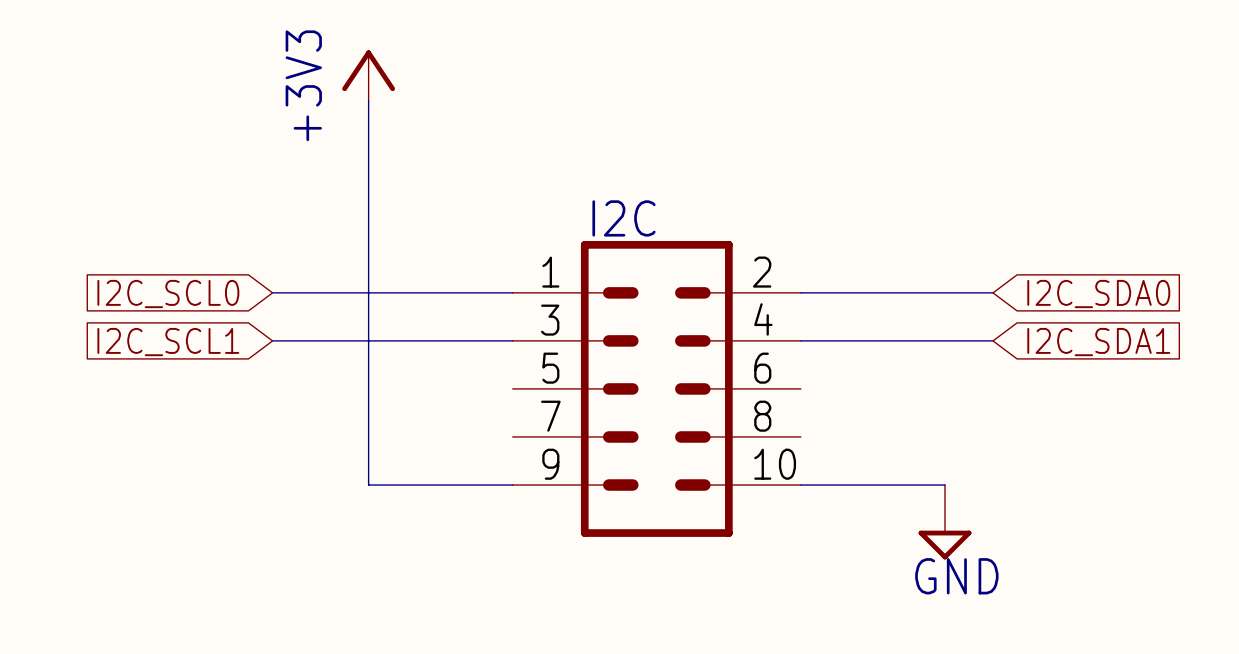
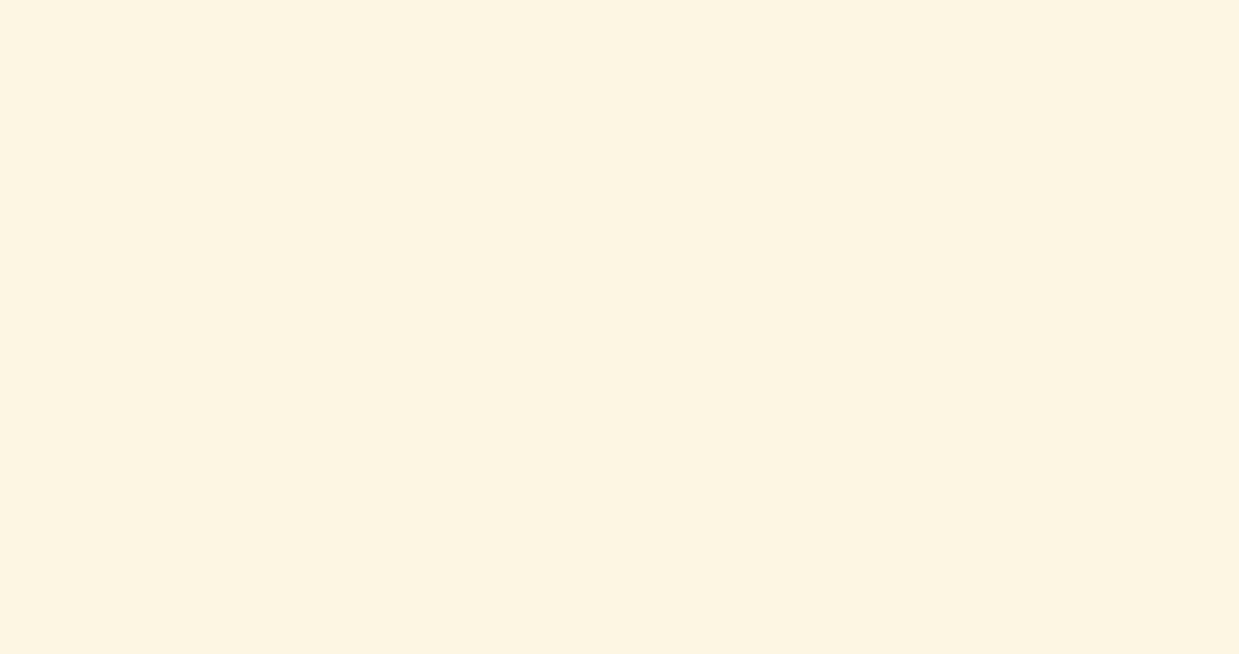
power symbol: +3V3 (368, 75) -> none
wire: (368, 100) (368, 485) (512, 485) -> none
wire: (272, 292) (512, 292) -> none
wire: (800, 292) (993, 292) -> none
global label: I2C_SCL0 (168, 294) -> none
global label: I2C_SDA0 (1098, 294) -> none
wire: (272, 340) (512, 340) -> none
wire: (800, 340) (993, 340) -> none
global label: I2C_SCL1 (168, 342) -> none
global label: I2C_SDA1 (1098, 342) -> none
I2C: (656, 388) -> none
wire: (800, 485) (945, 485) -> none
power symbol: GND (945, 522) -> none

